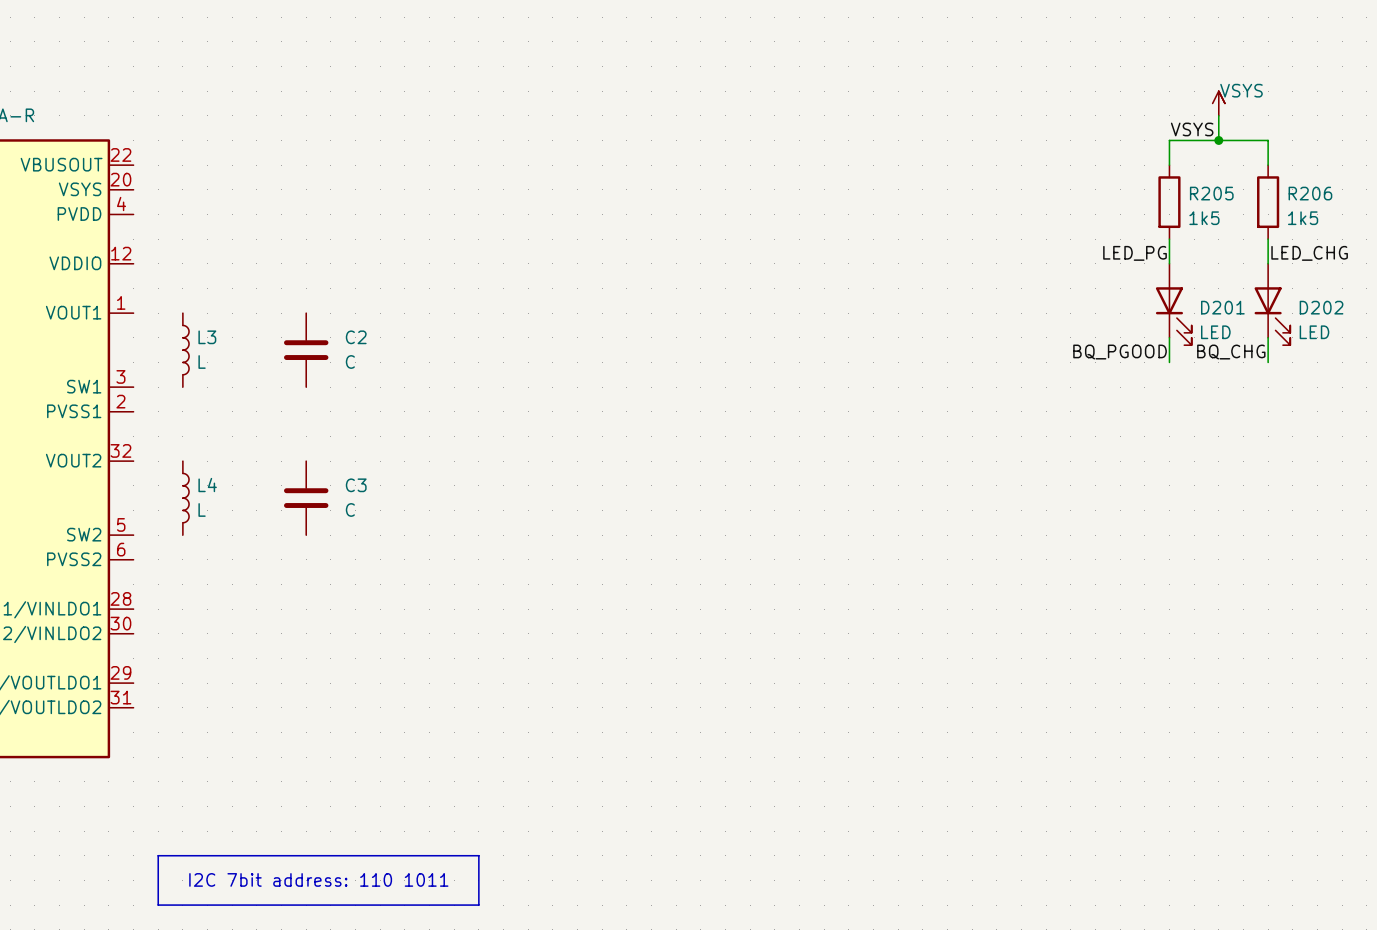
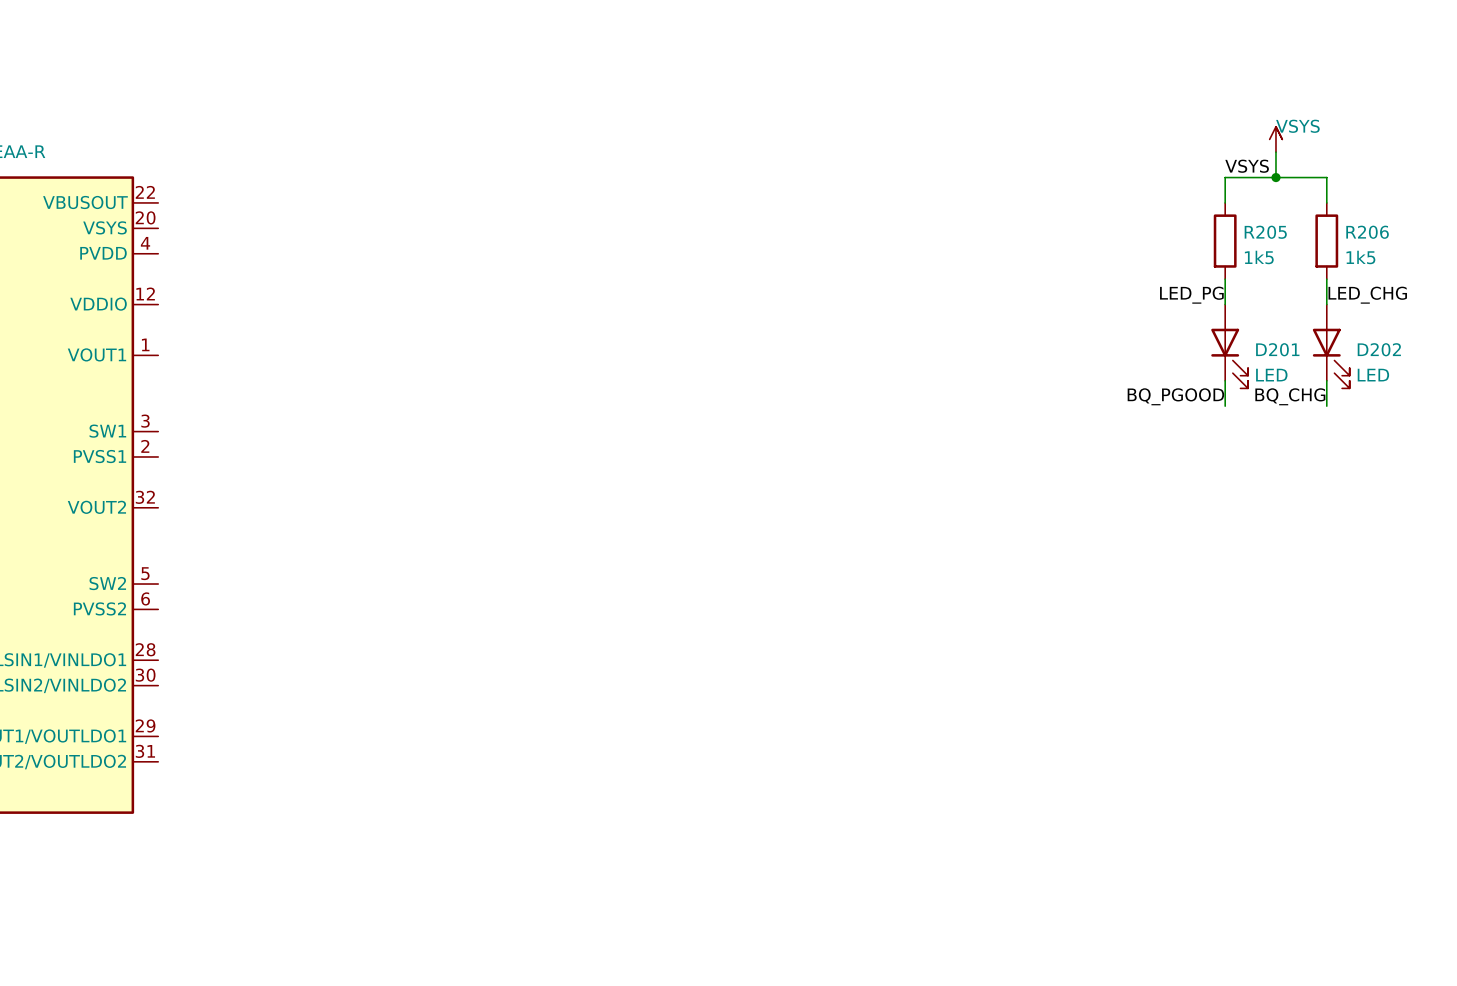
L3: L (185, 350) -> none
C2: C (306, 350) -> none
L4: L (185, 498) -> none
C3: C (306, 498) -> none
line: (158, 855) (478, 855) (478, 905) (158, 905) (158, 855) -> none
text: I2C 7bit address: 110 1011 (318, 879) -> none

